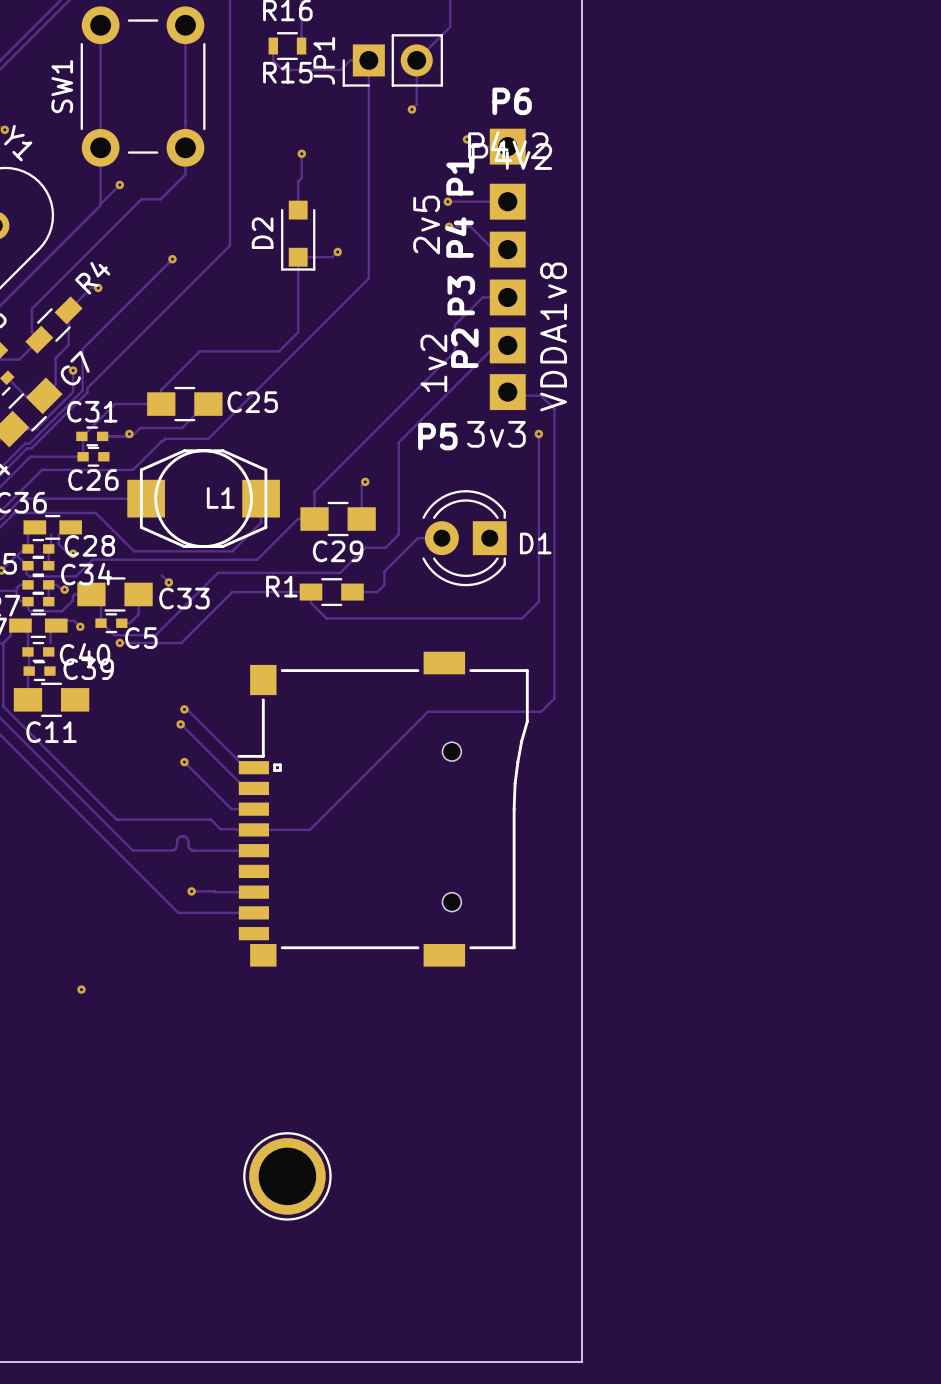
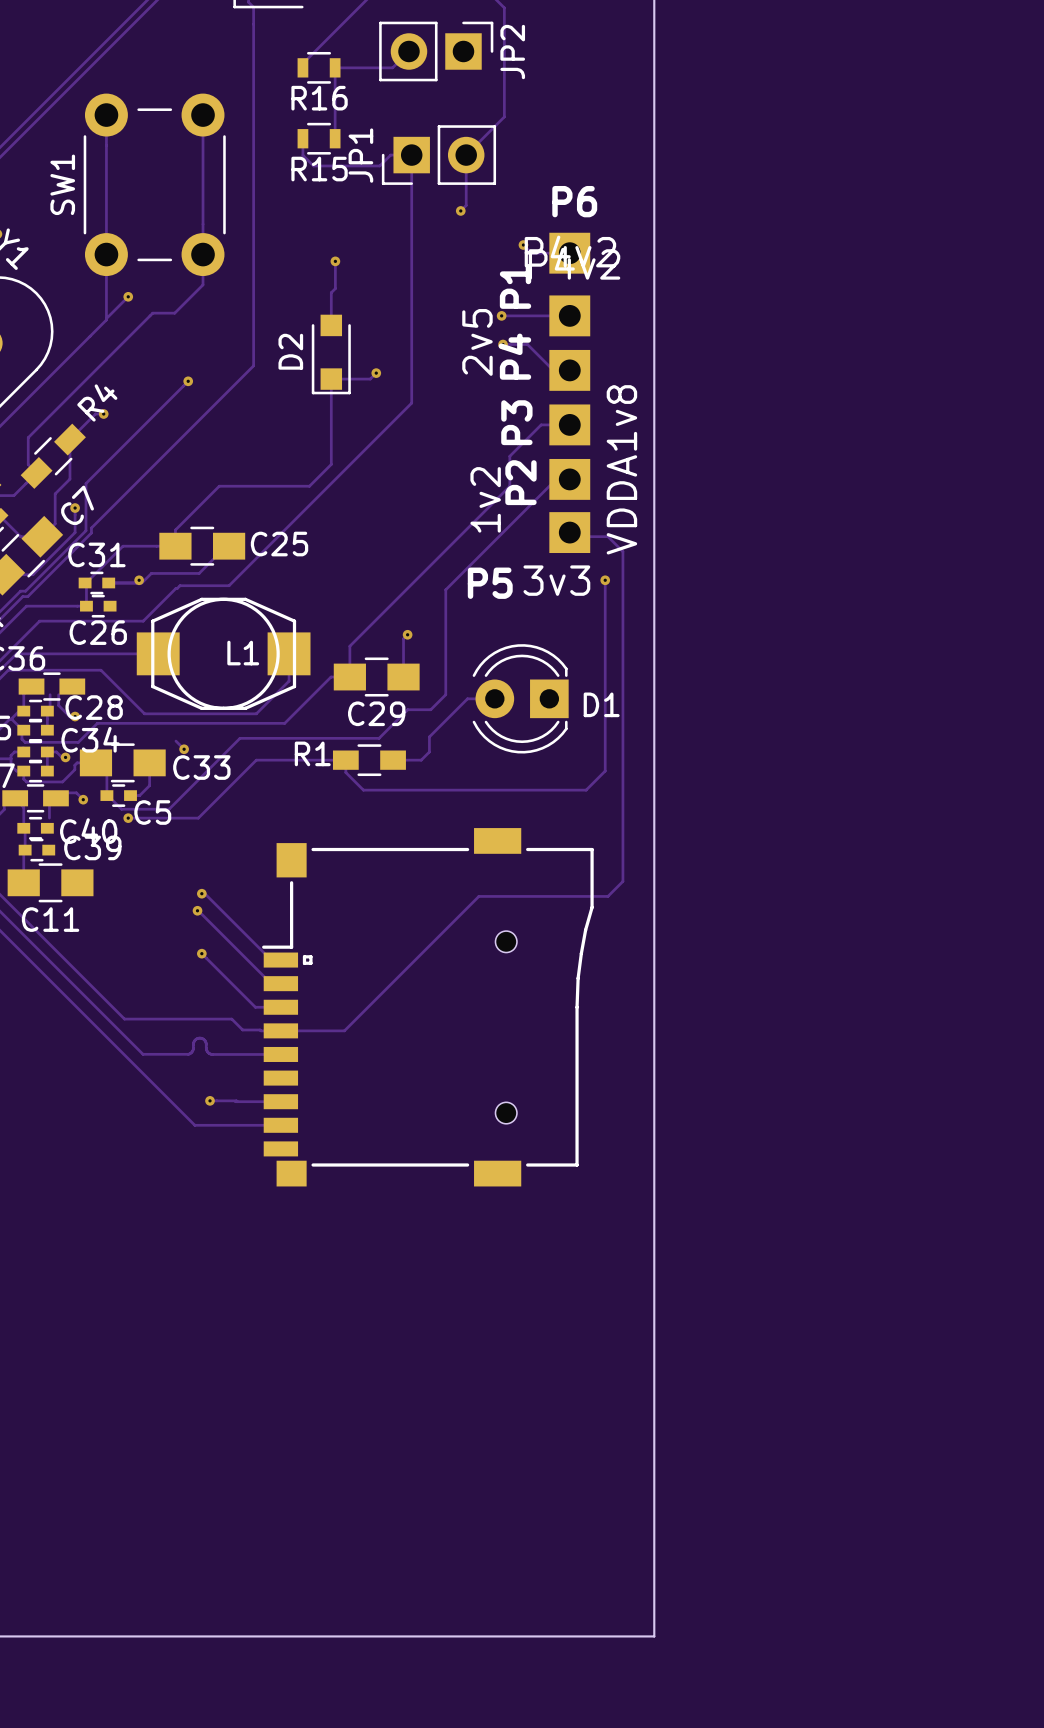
via: (81, 989) -> none
part: (287, 1176) -> none

